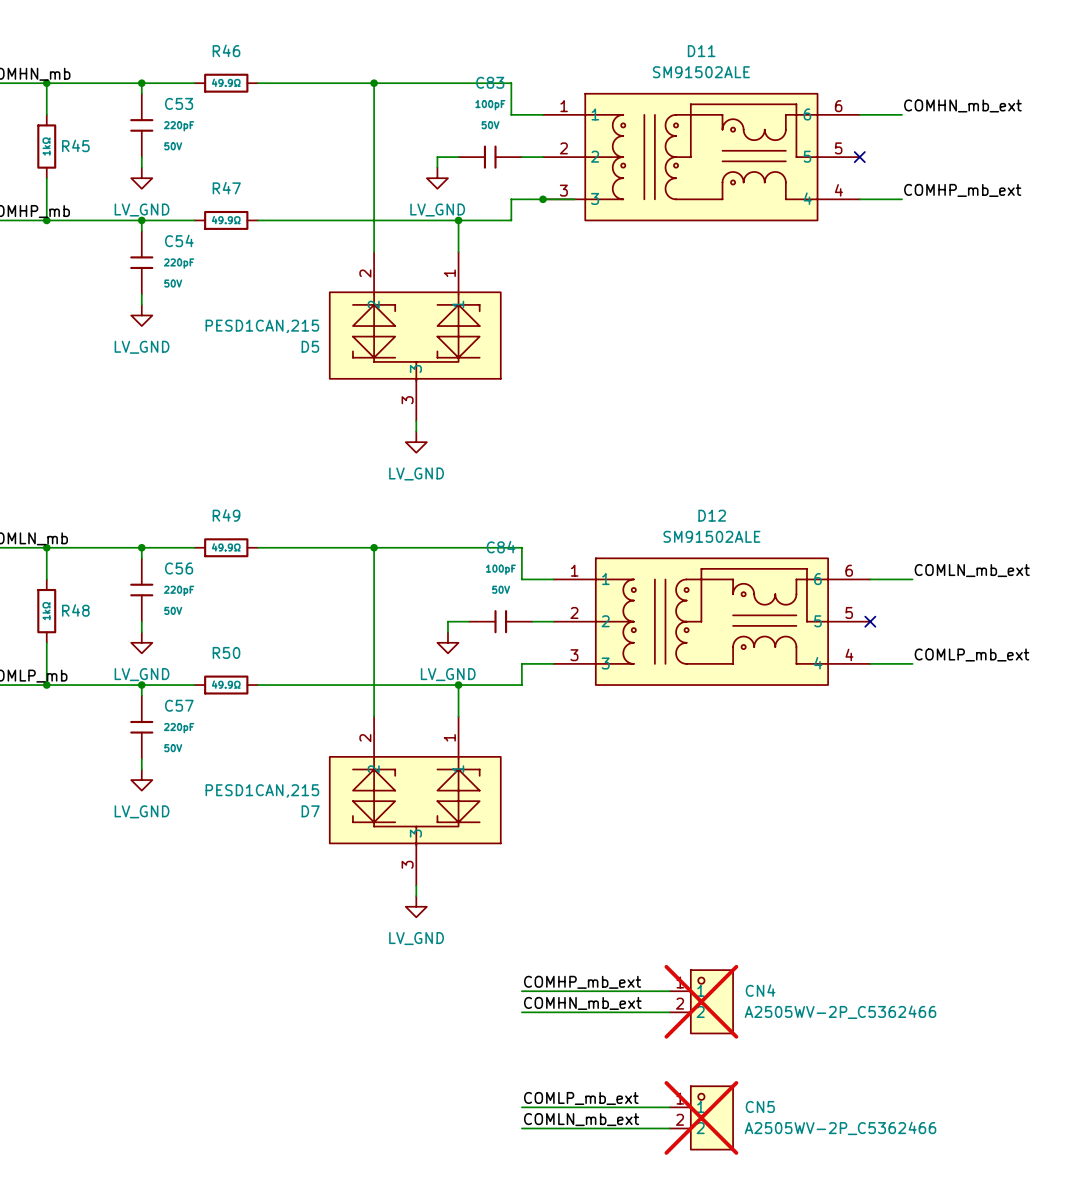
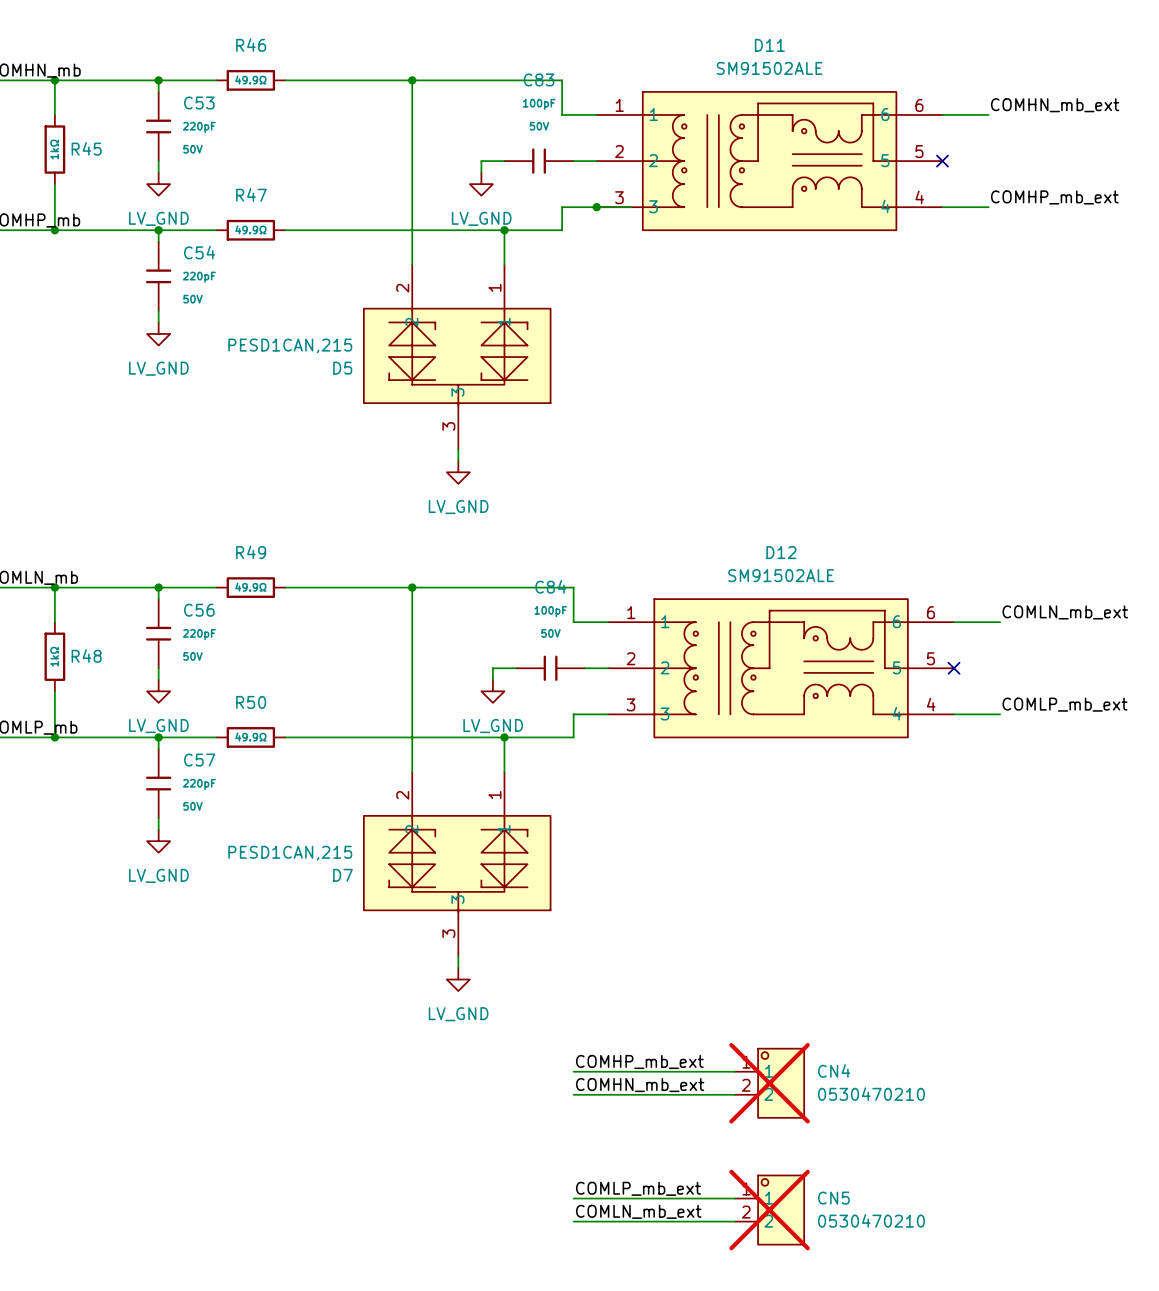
CN4 symbol: [669, 970, 734, 1034] -> [735, 1048, 805, 1118]
CN4 value: A2505WV-2P_C5362466 (840, 1012) -> 0530470210 (871, 1094)
CN5 symbol: [669, 1086, 734, 1150] -> [735, 1175, 805, 1245]
CN5 value: A2505WV-2P_C5362466 (840, 1128) -> 0530470210 (871, 1220)

